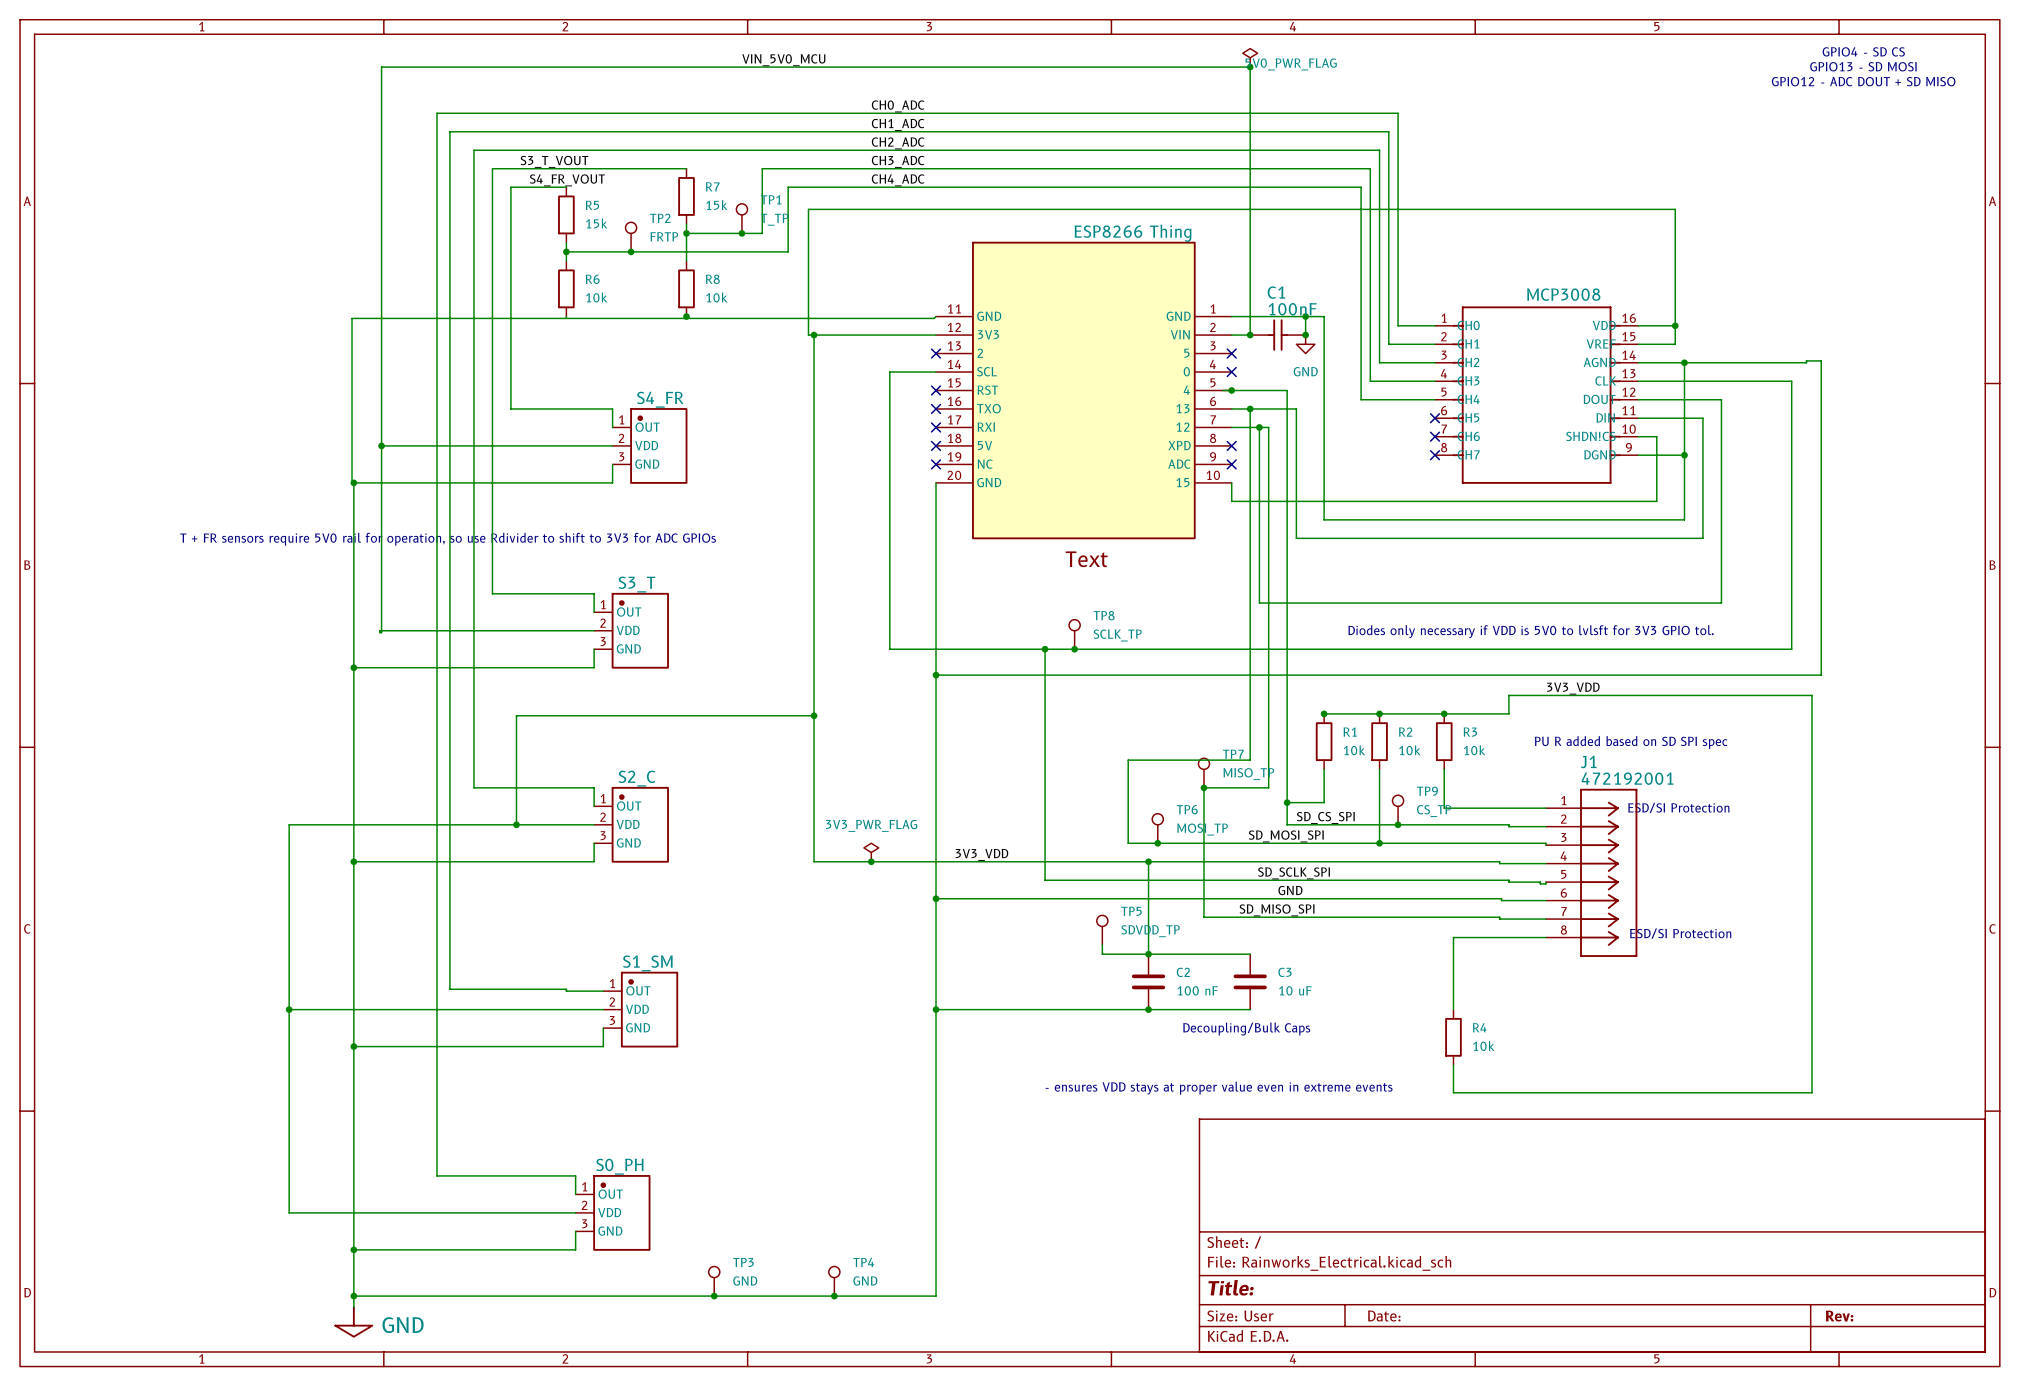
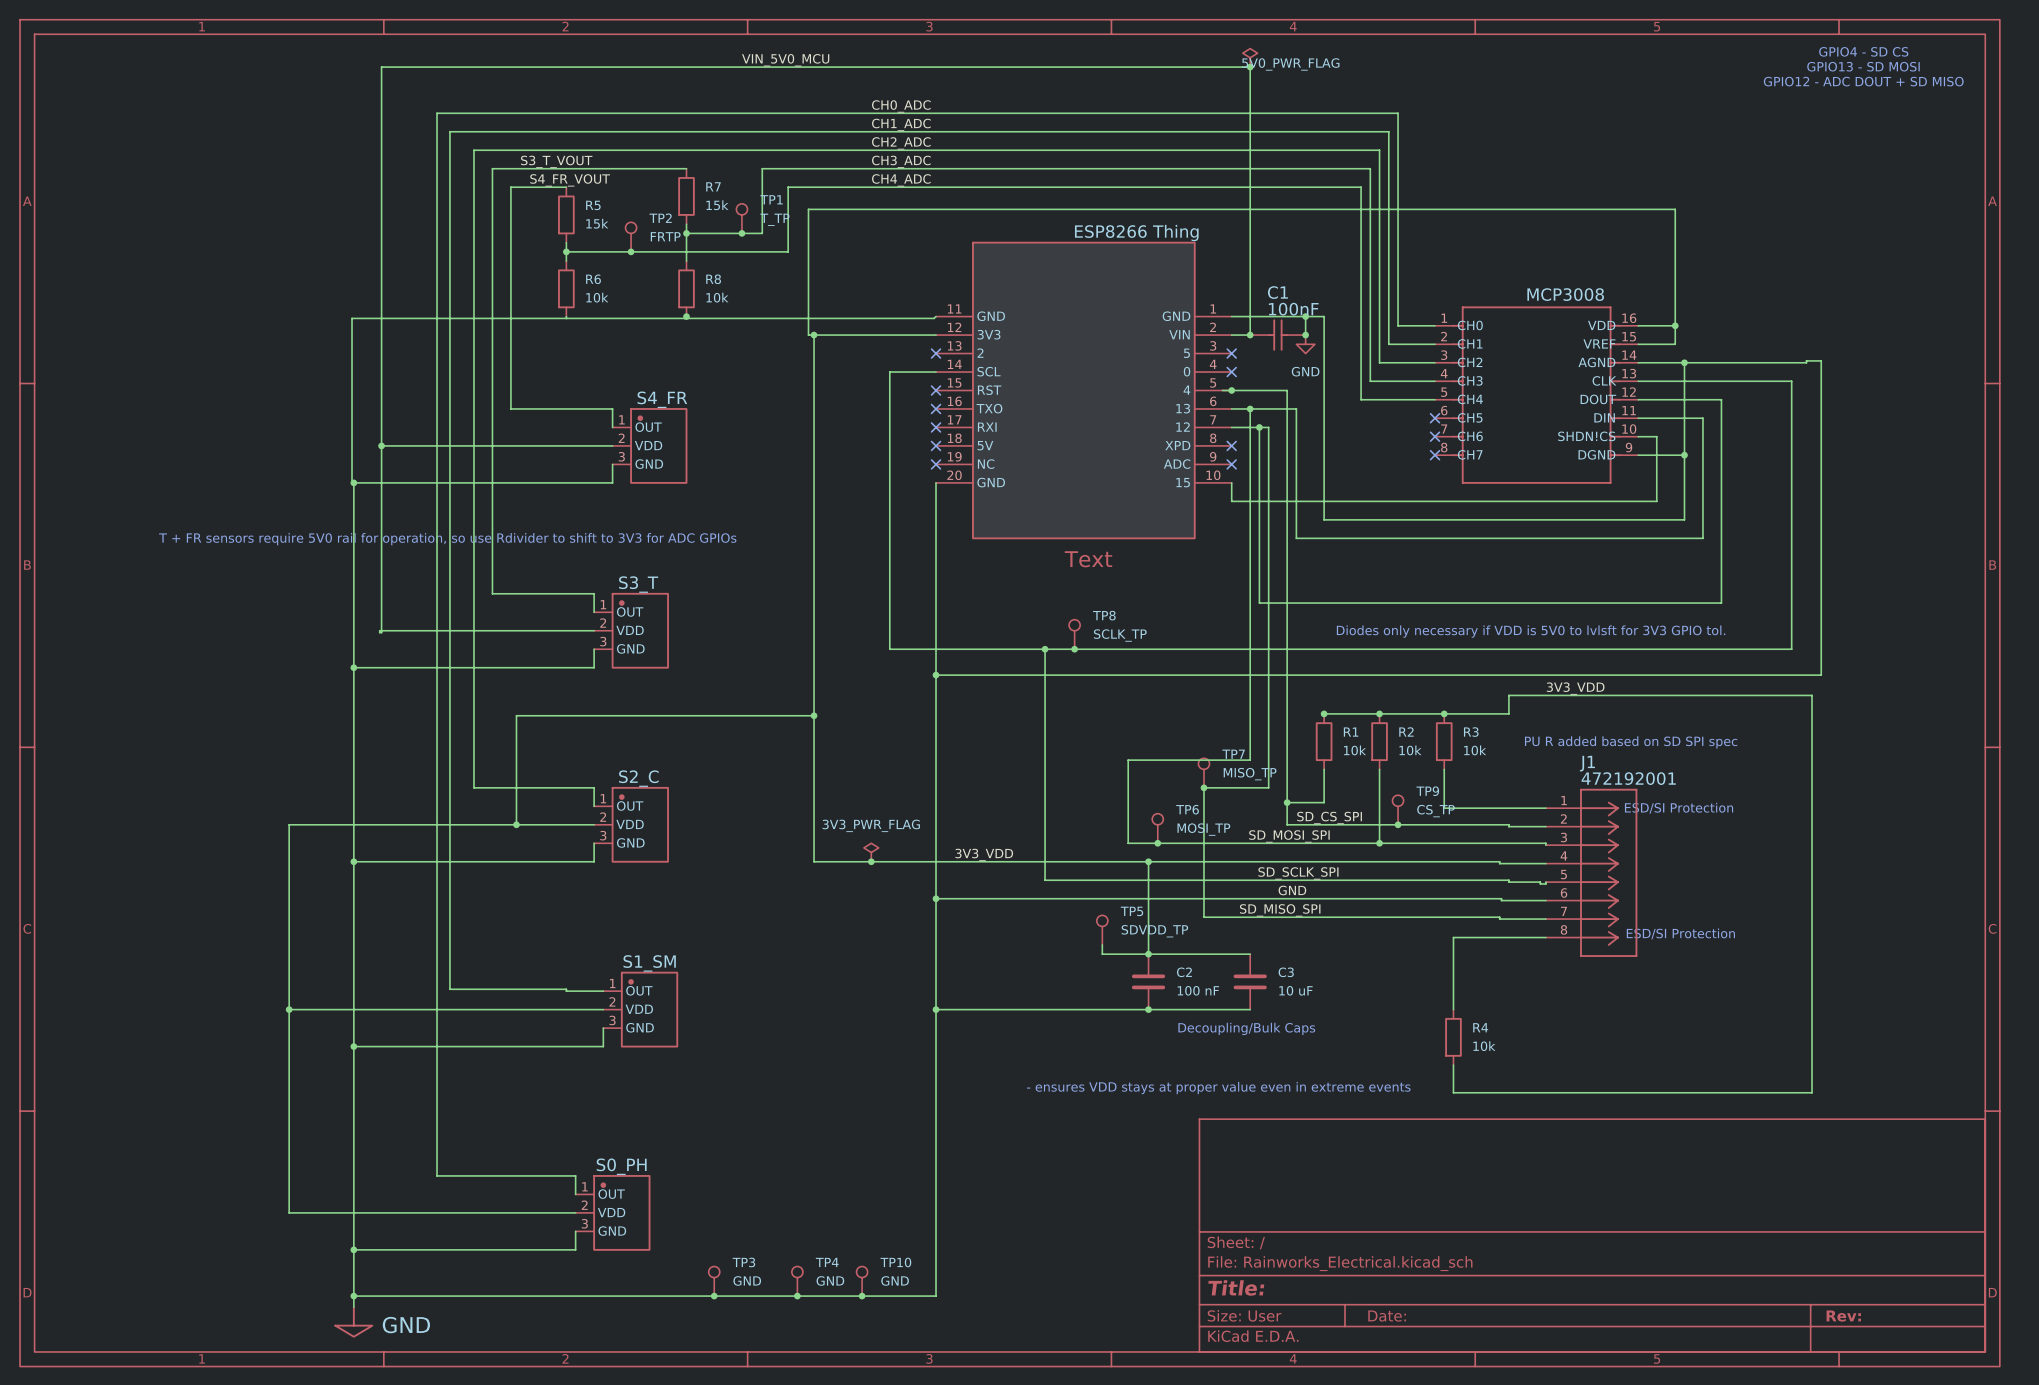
TP4 position: (834, 1281) -> (797, 1281)
TP10: none -> GND (862, 1281)
junction: none -> (797, 1296)
junction: (834, 1296) -> none
junction: none -> (862, 1296)

